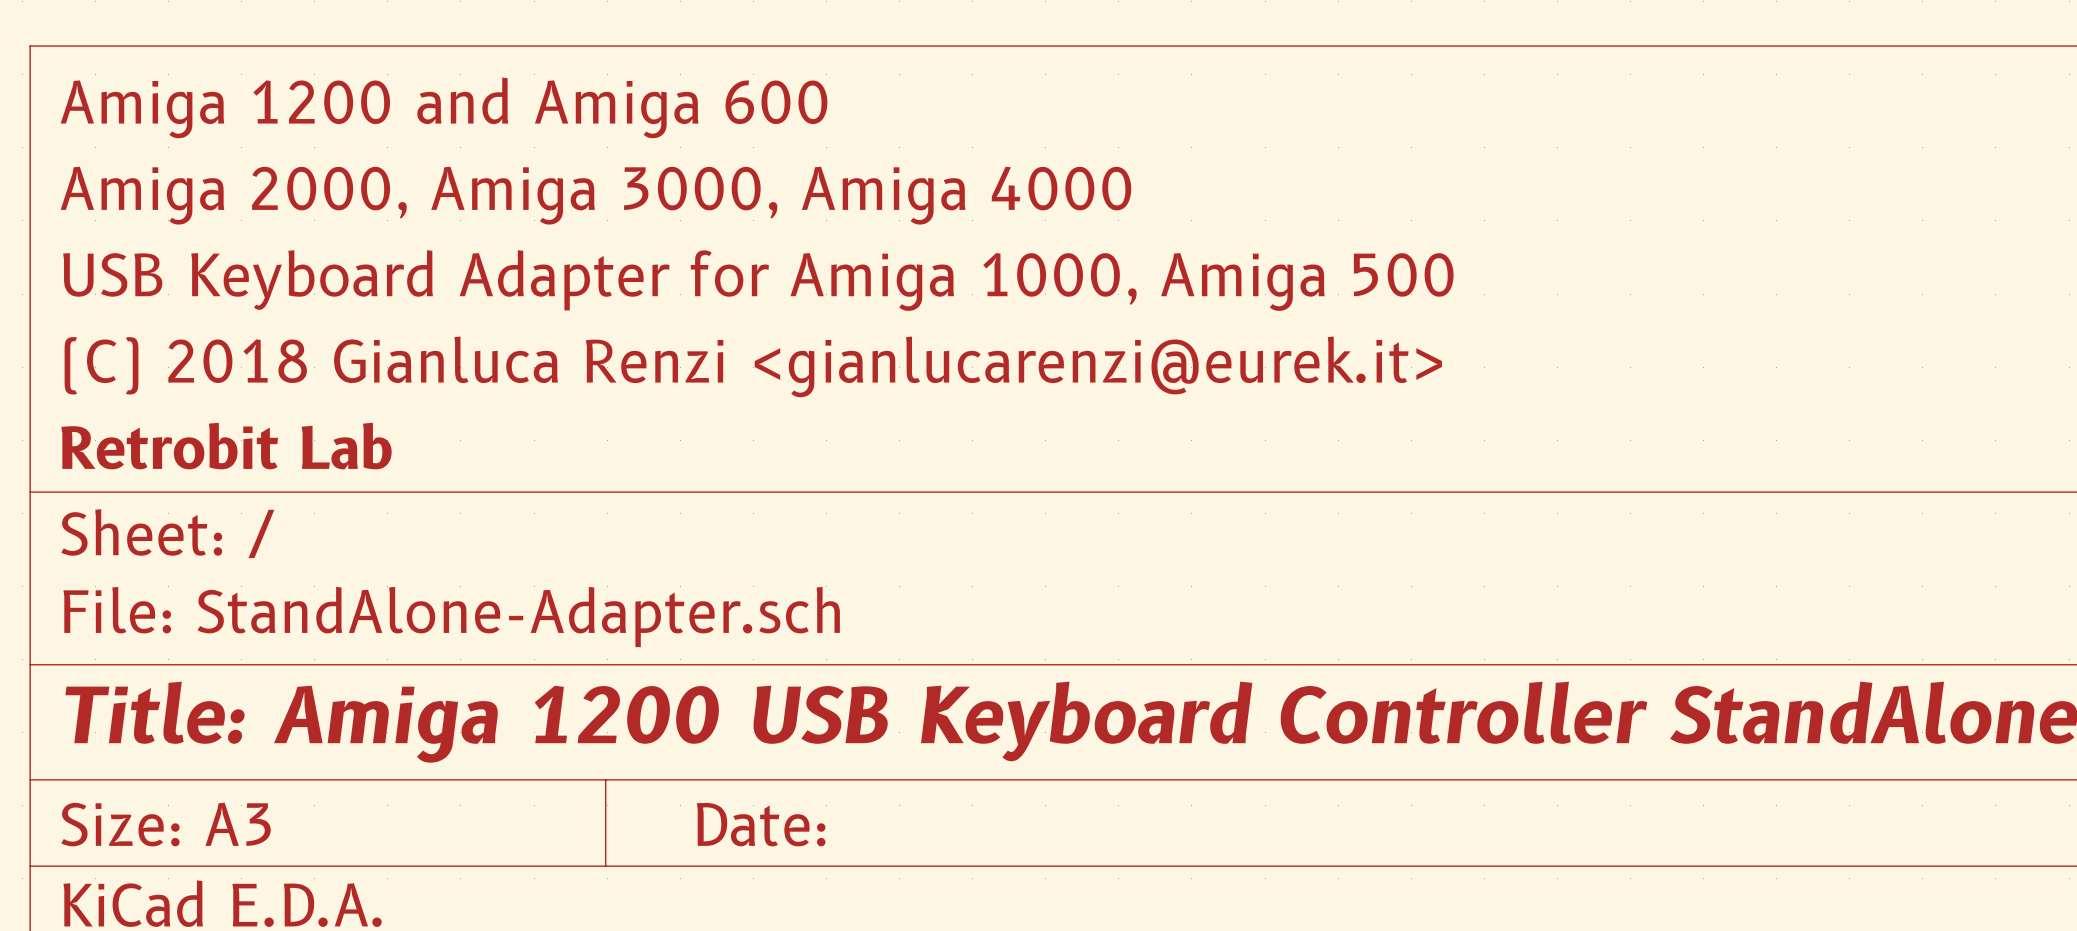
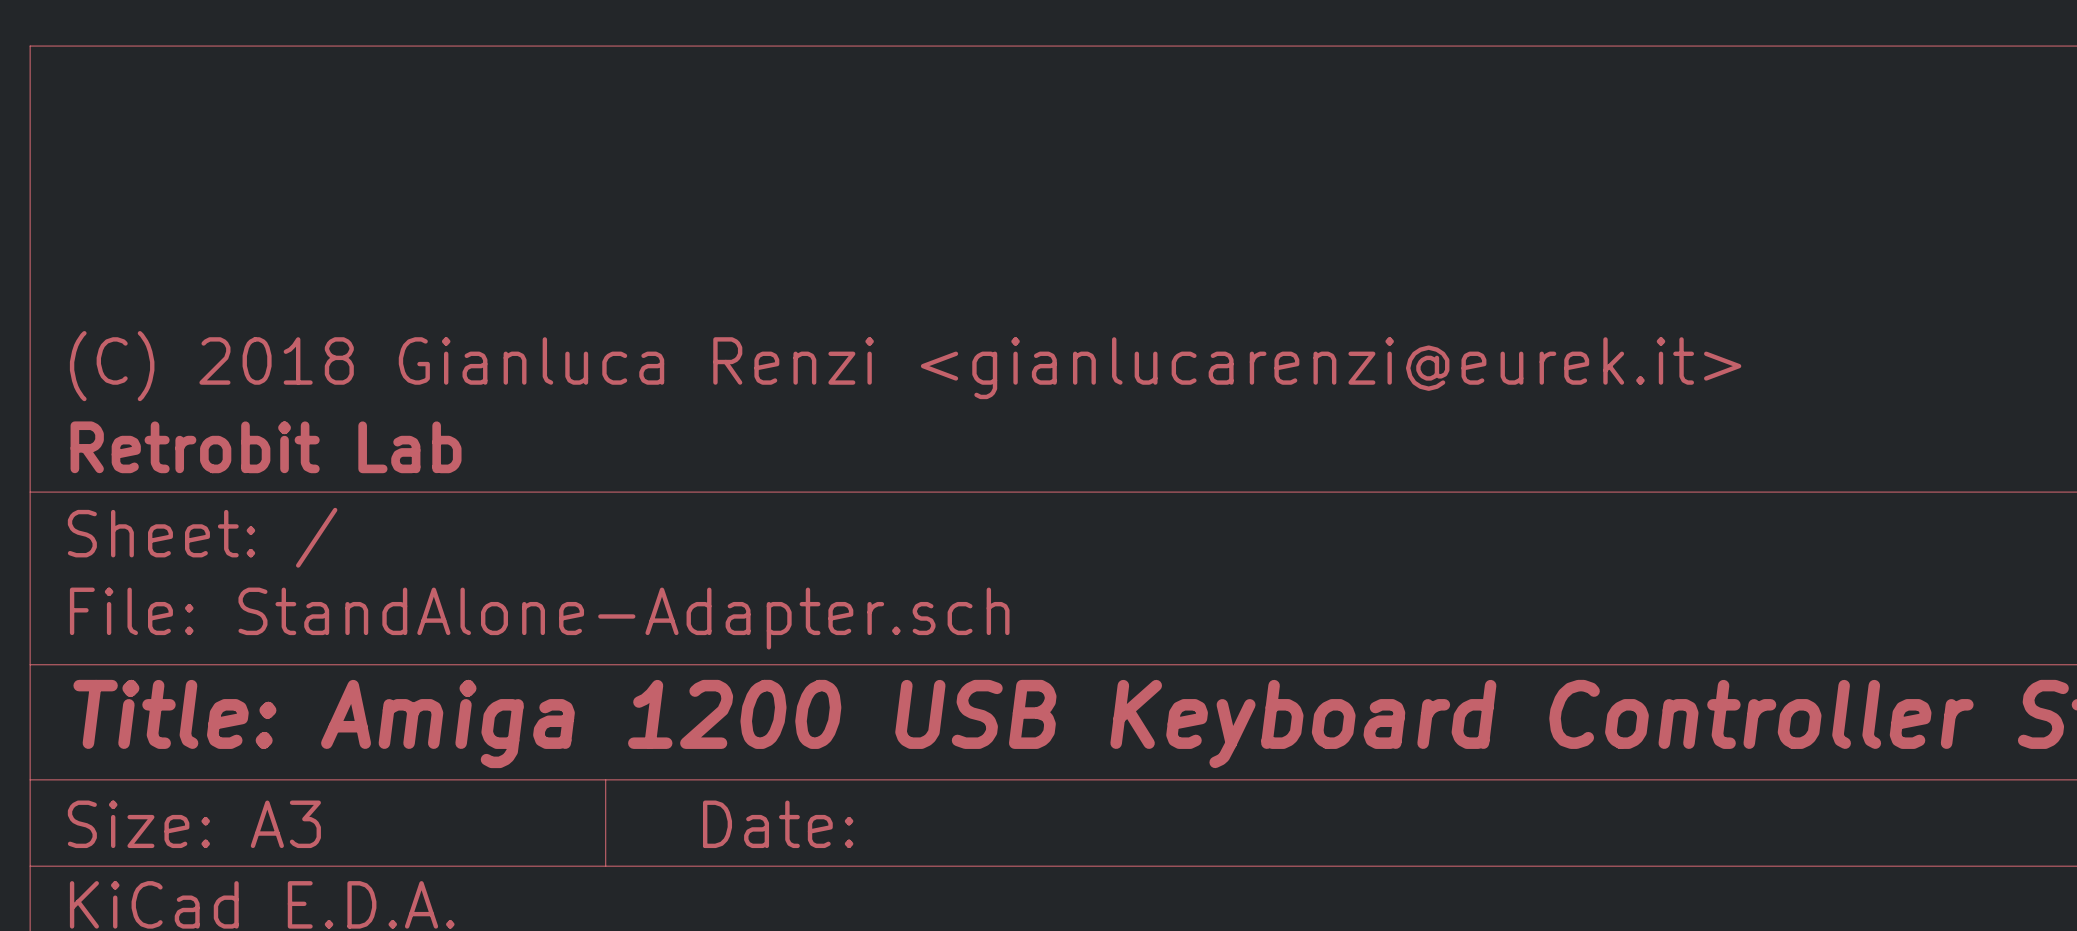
title block: Amiga 1200 and Amiga 600 (444, 107) -> none
title block: Amiga 2000, Amiga 3000, Amiga 4000 (595, 195) -> none
title block: USB Keyboard Adapter for Amiga 1000, Amiga 500 (758, 280) -> none

